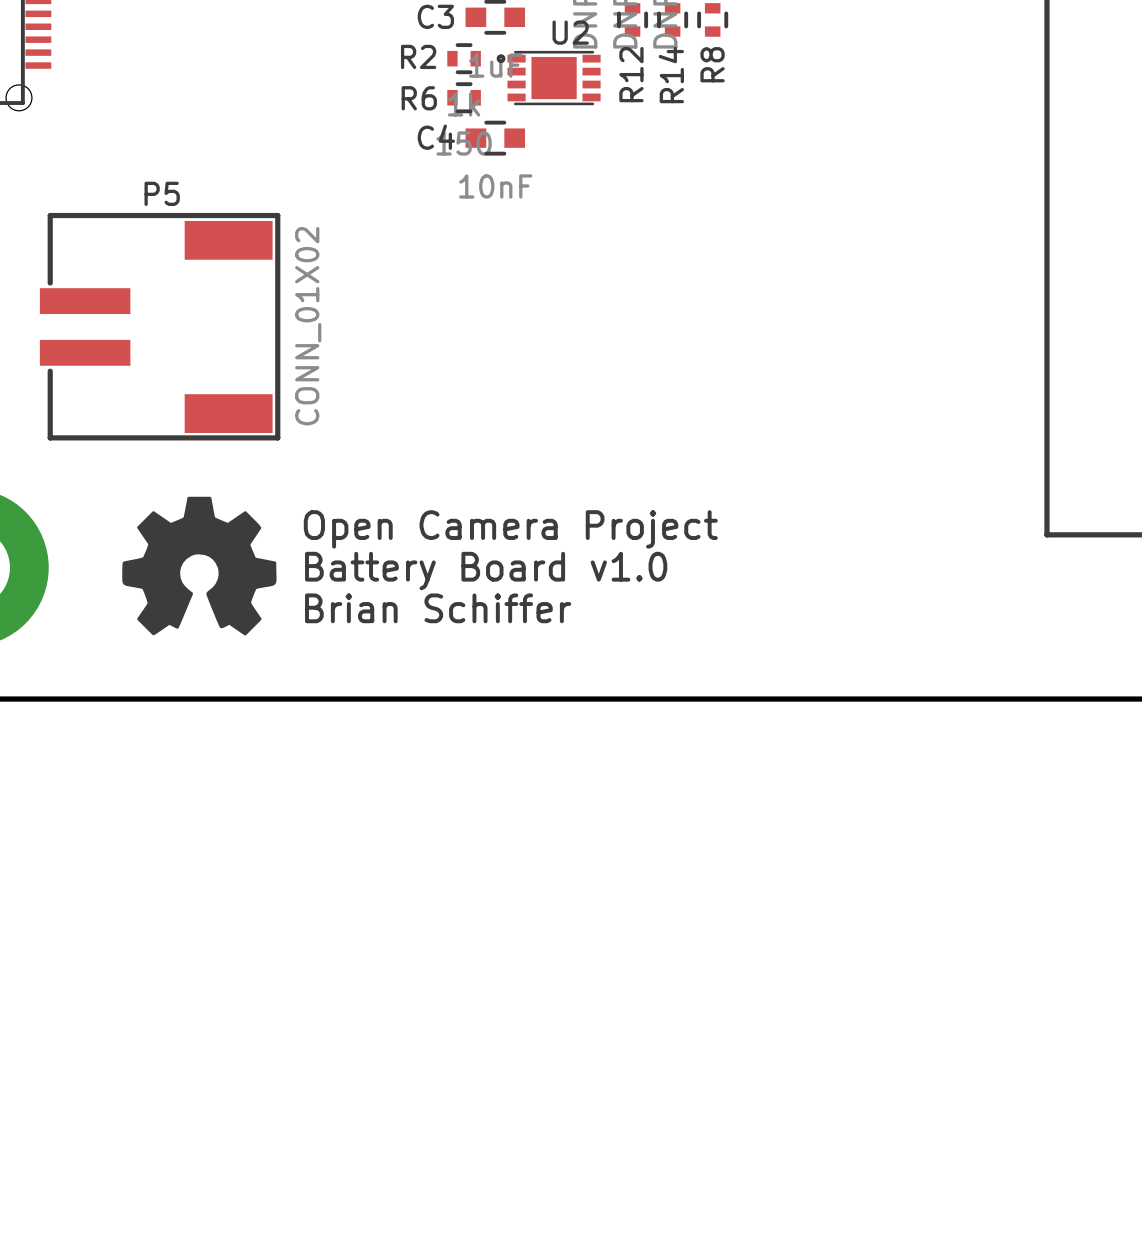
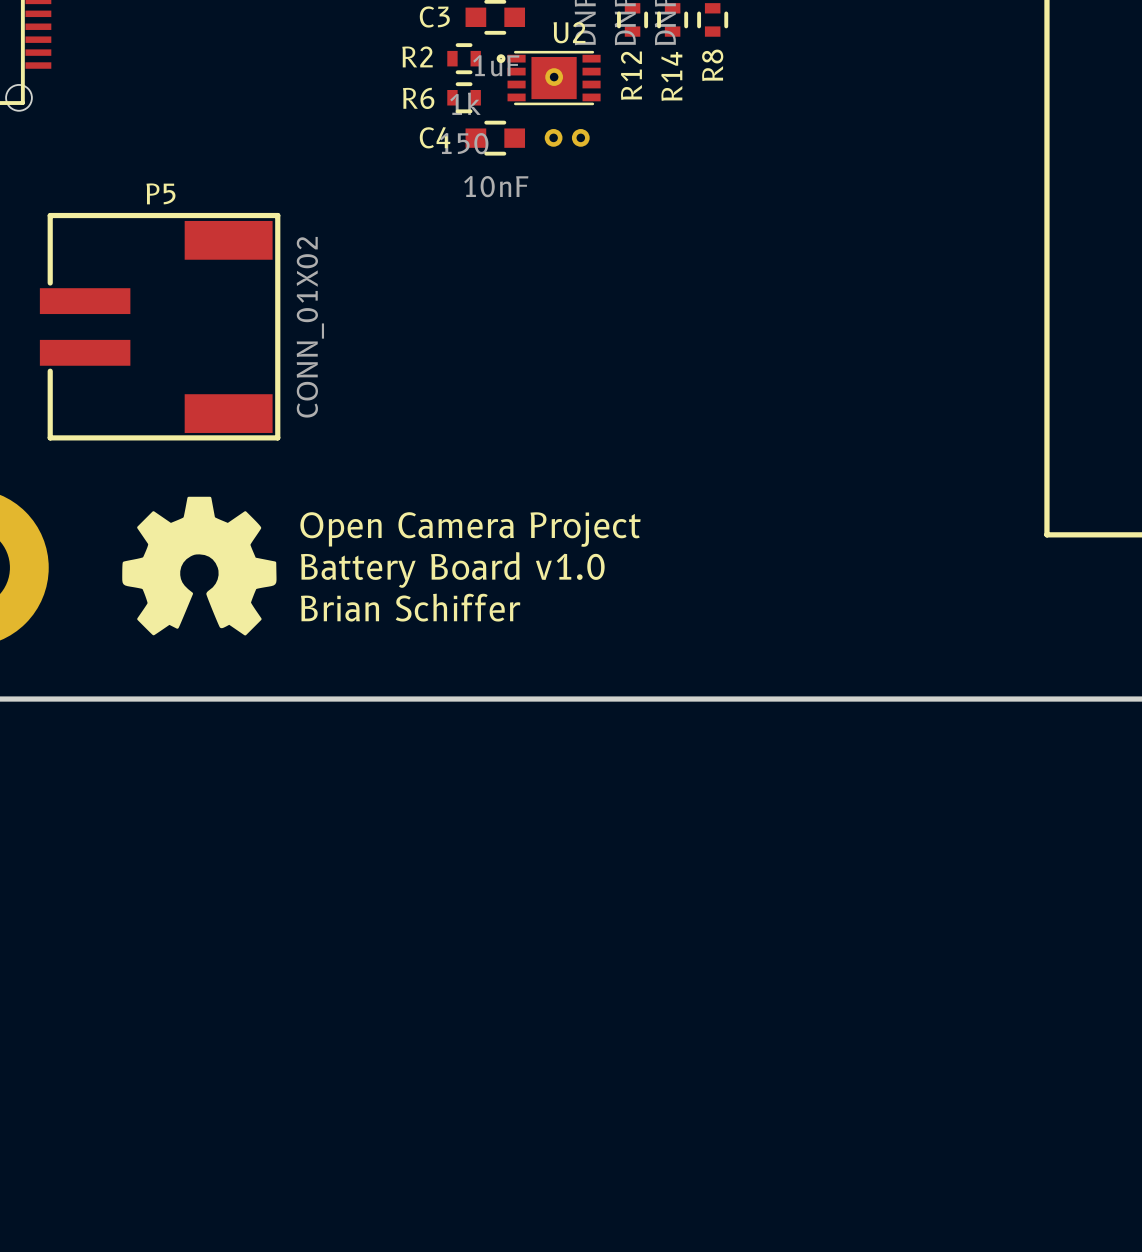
part: none -> (554, 77)
part: none -> (553, 137)
part: none -> (580, 137)

